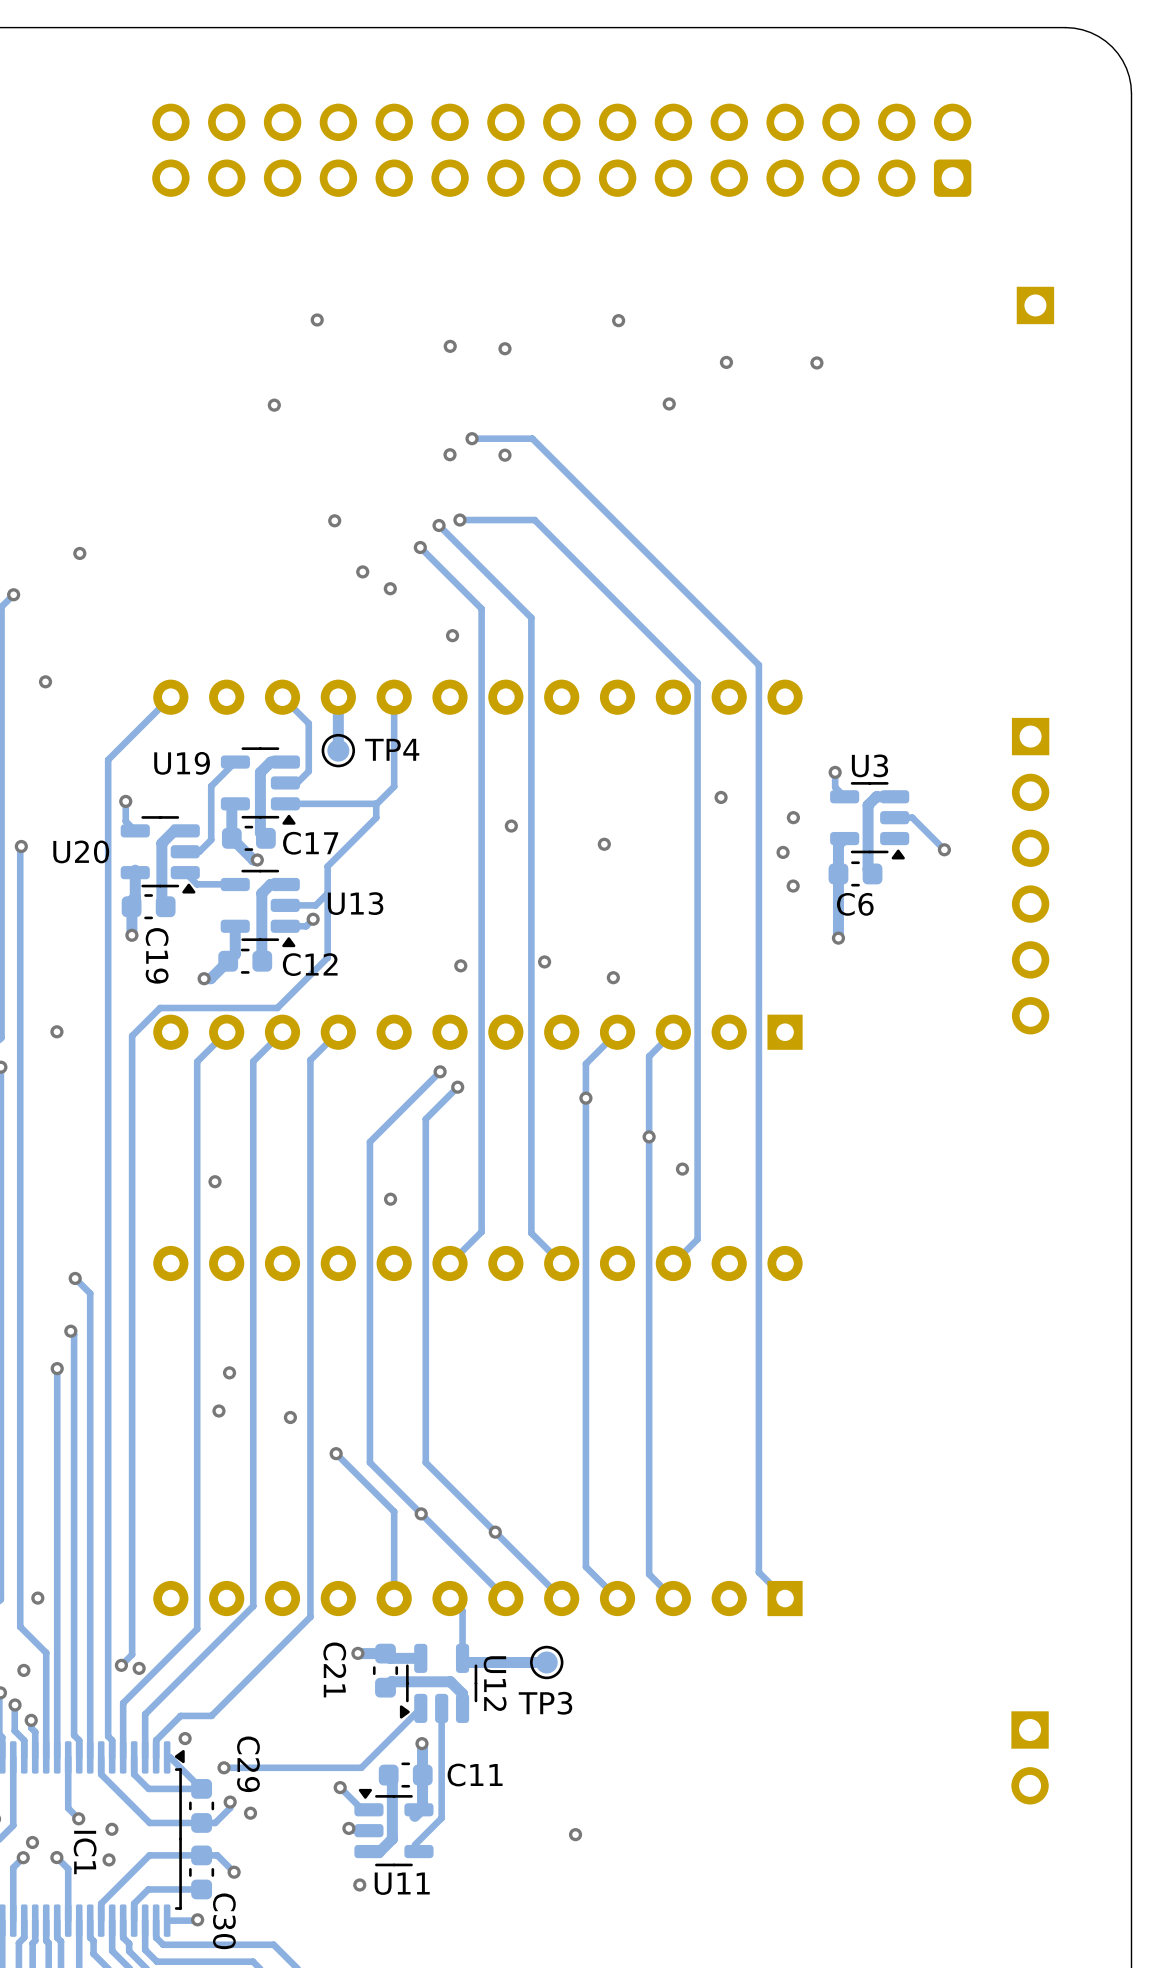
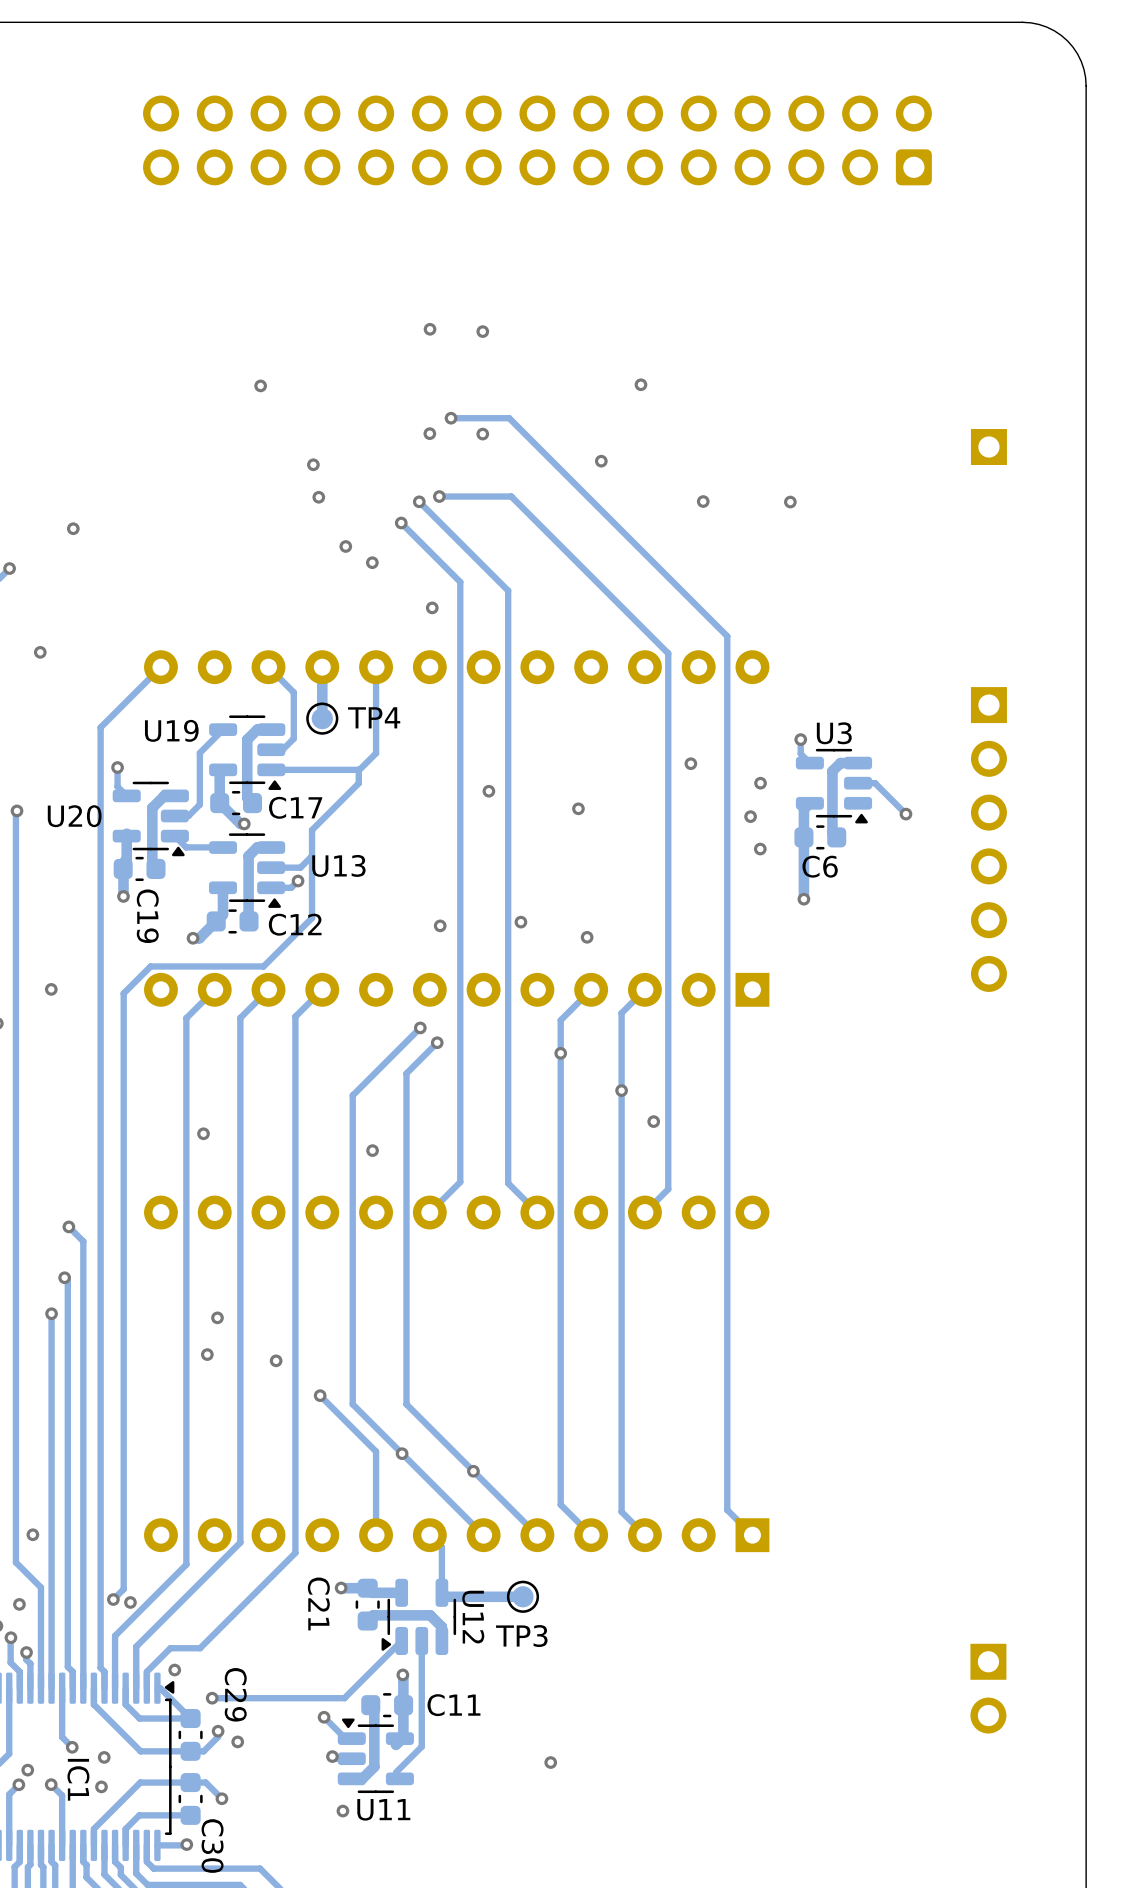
part position: (1035, 305) -> (988, 446)
via: (317, 319) -> none
via: (618, 320) -> none
via: (726, 362) -> none
via: (816, 362) -> none
via: none -> (601, 461)
via: none -> (313, 464)
via: none -> (703, 501)
via: none -> (790, 502)

